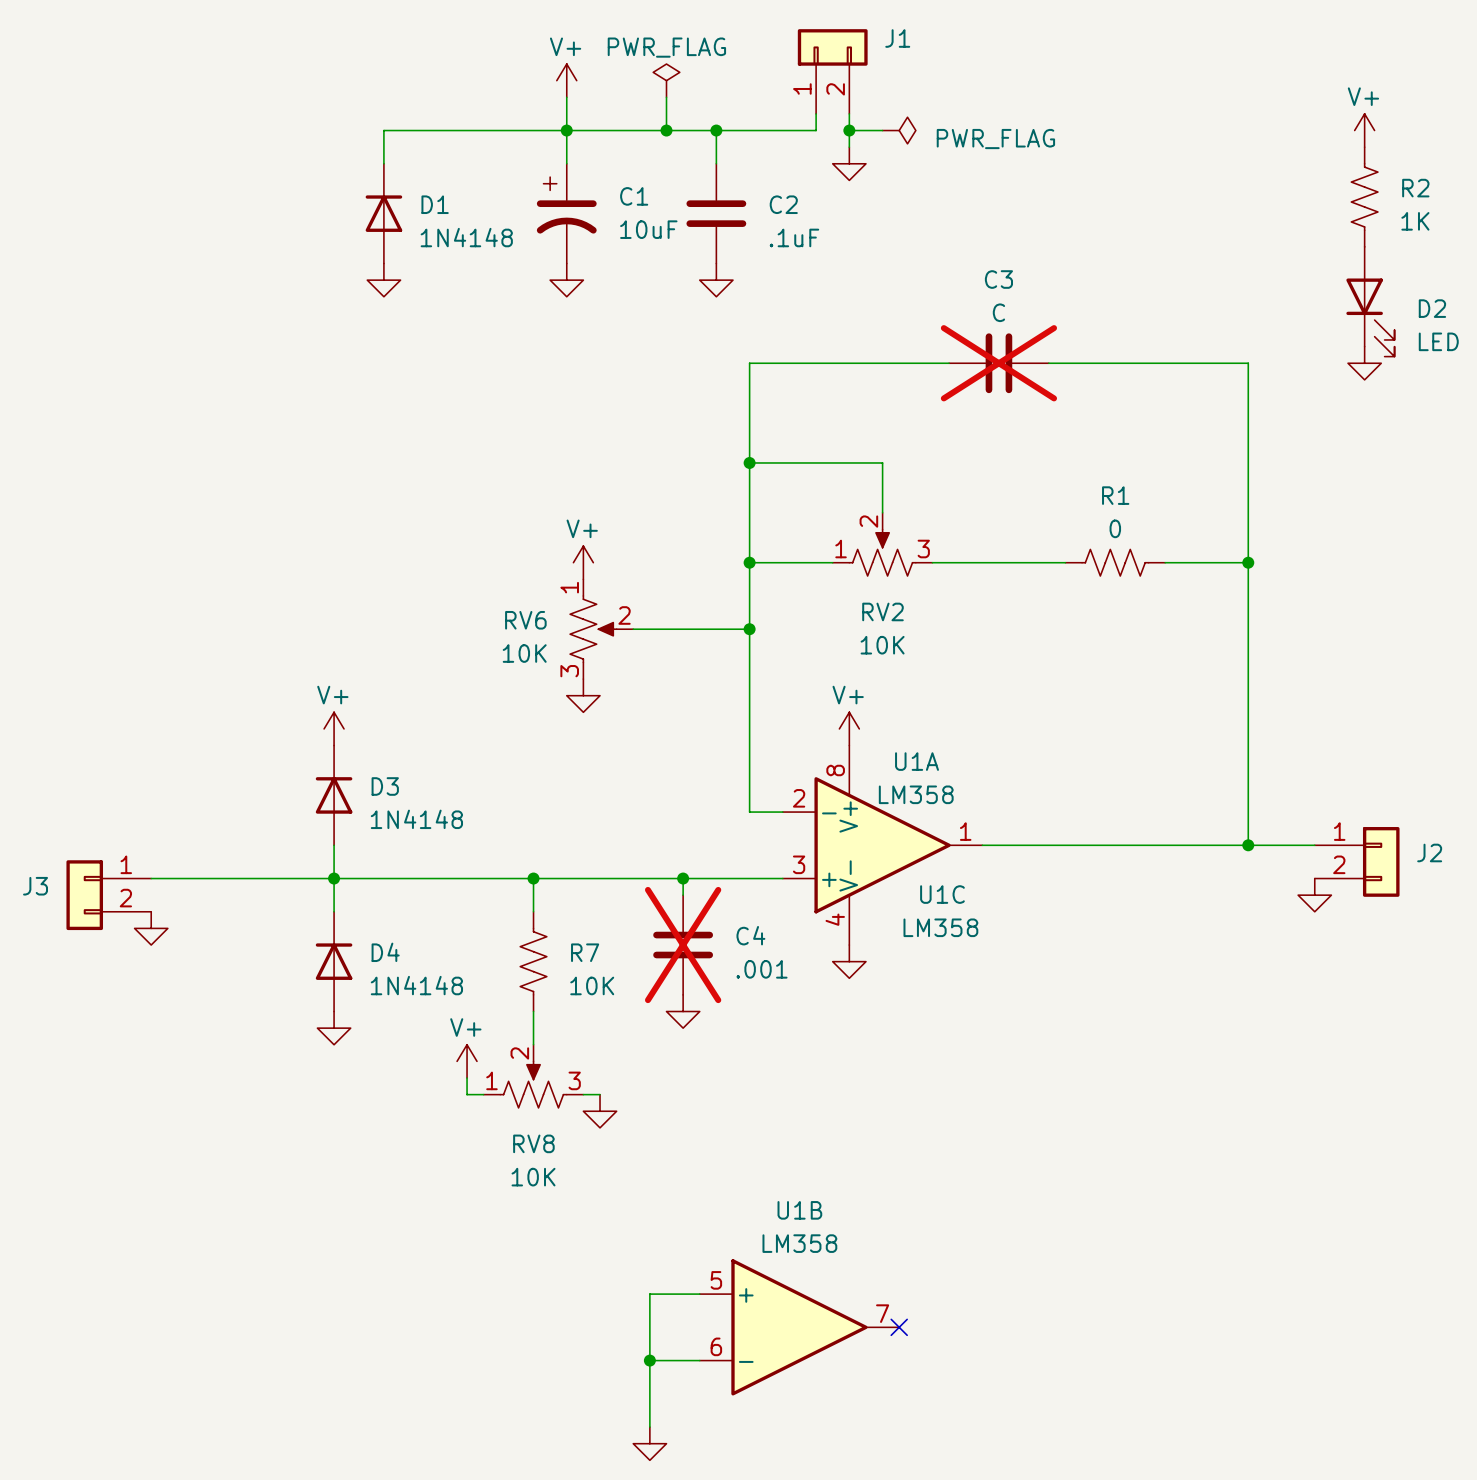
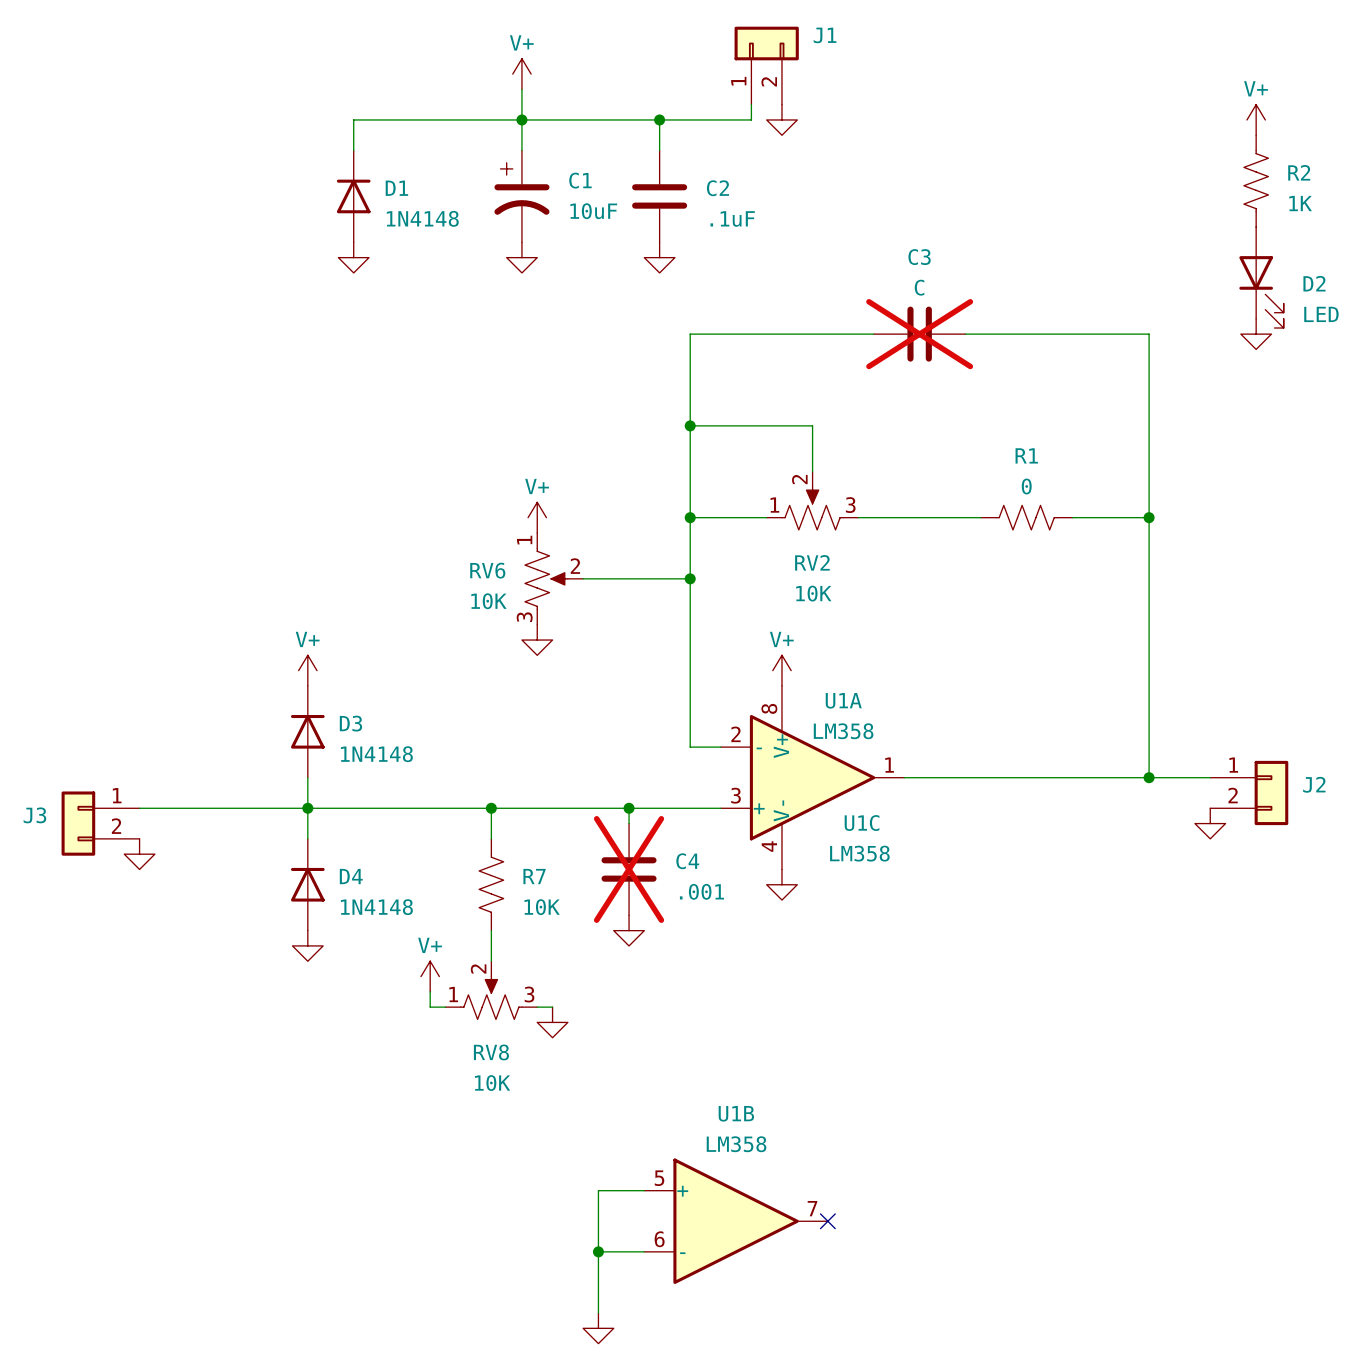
power symbol: PWR_FLAG (666, 80) -> none
wire: (666, 97) (666, 130) -> none
junction: (666, 130) -> none
wire: (849, 130) (882, 130) -> none
junction: (849, 130) -> none
power symbol: PWR_FLAG (899, 130) -> none
power symbol position: (849, 163) -> (781, 119)

